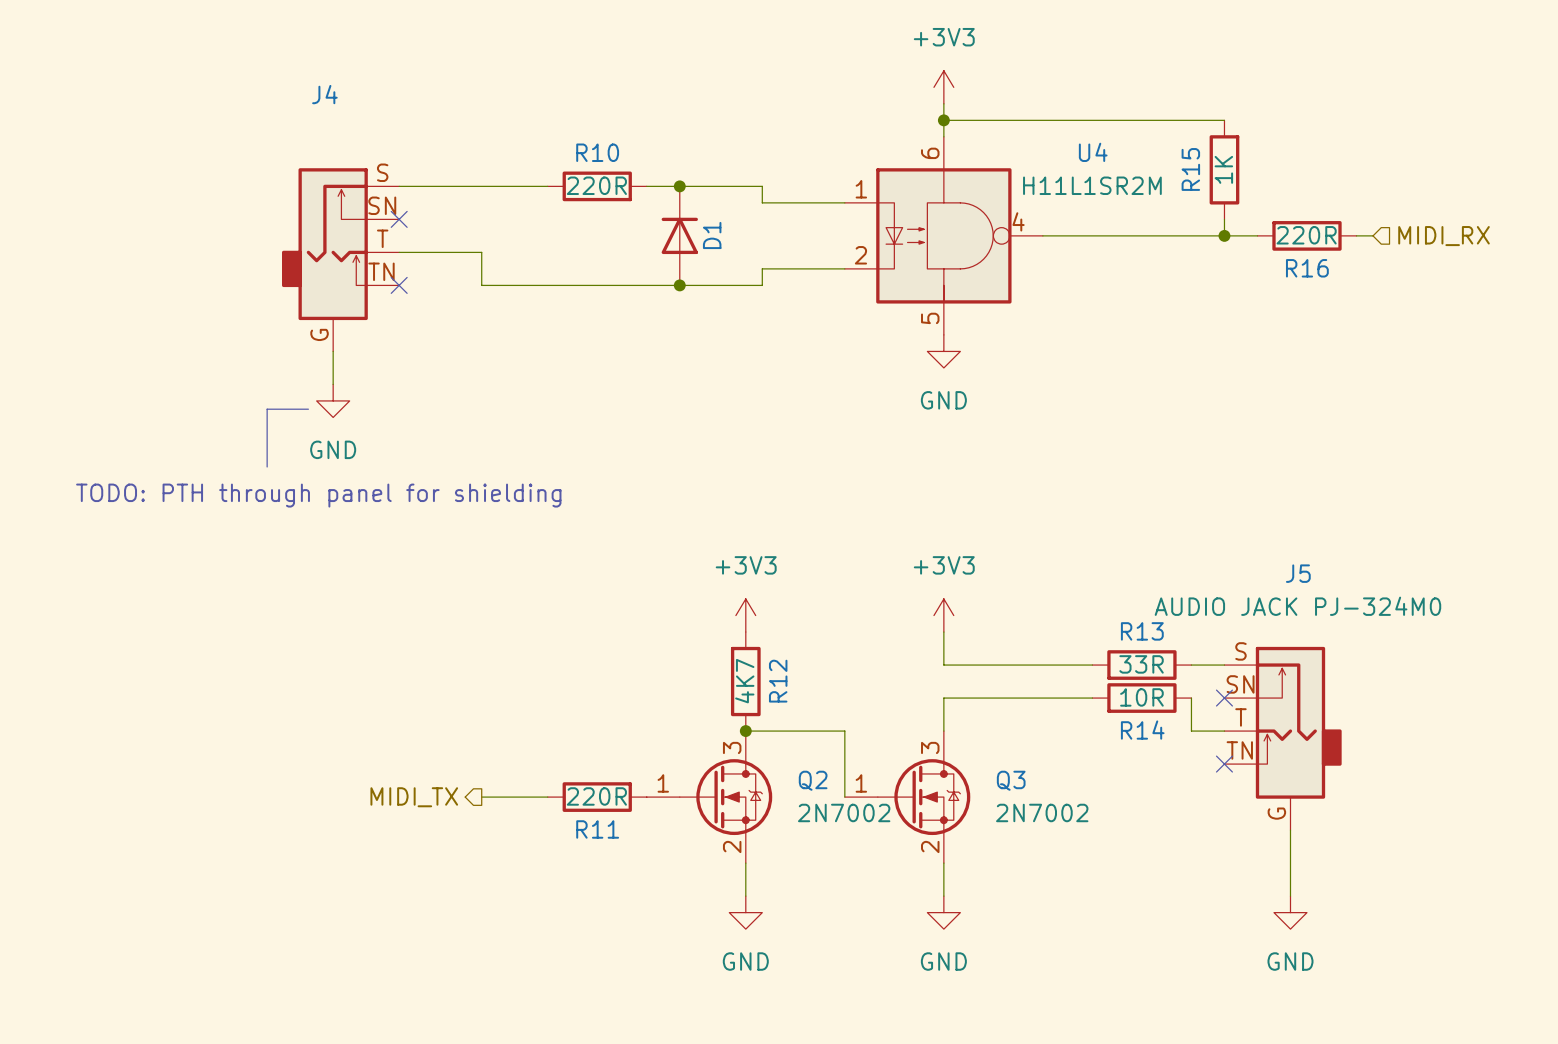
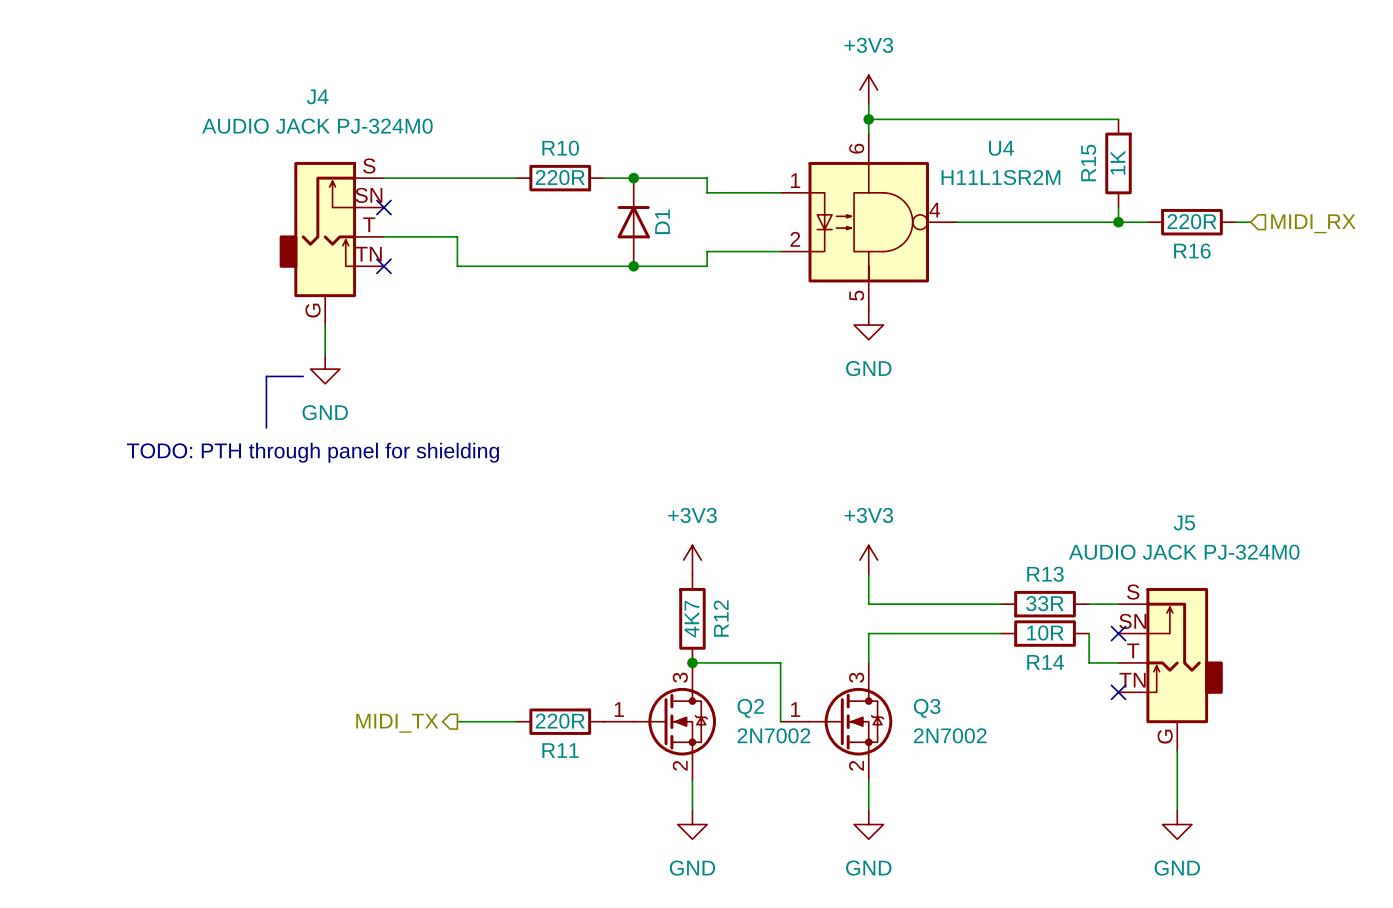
J4 value: none -> AUDIO JACK PJ-324M0 (317, 126)

